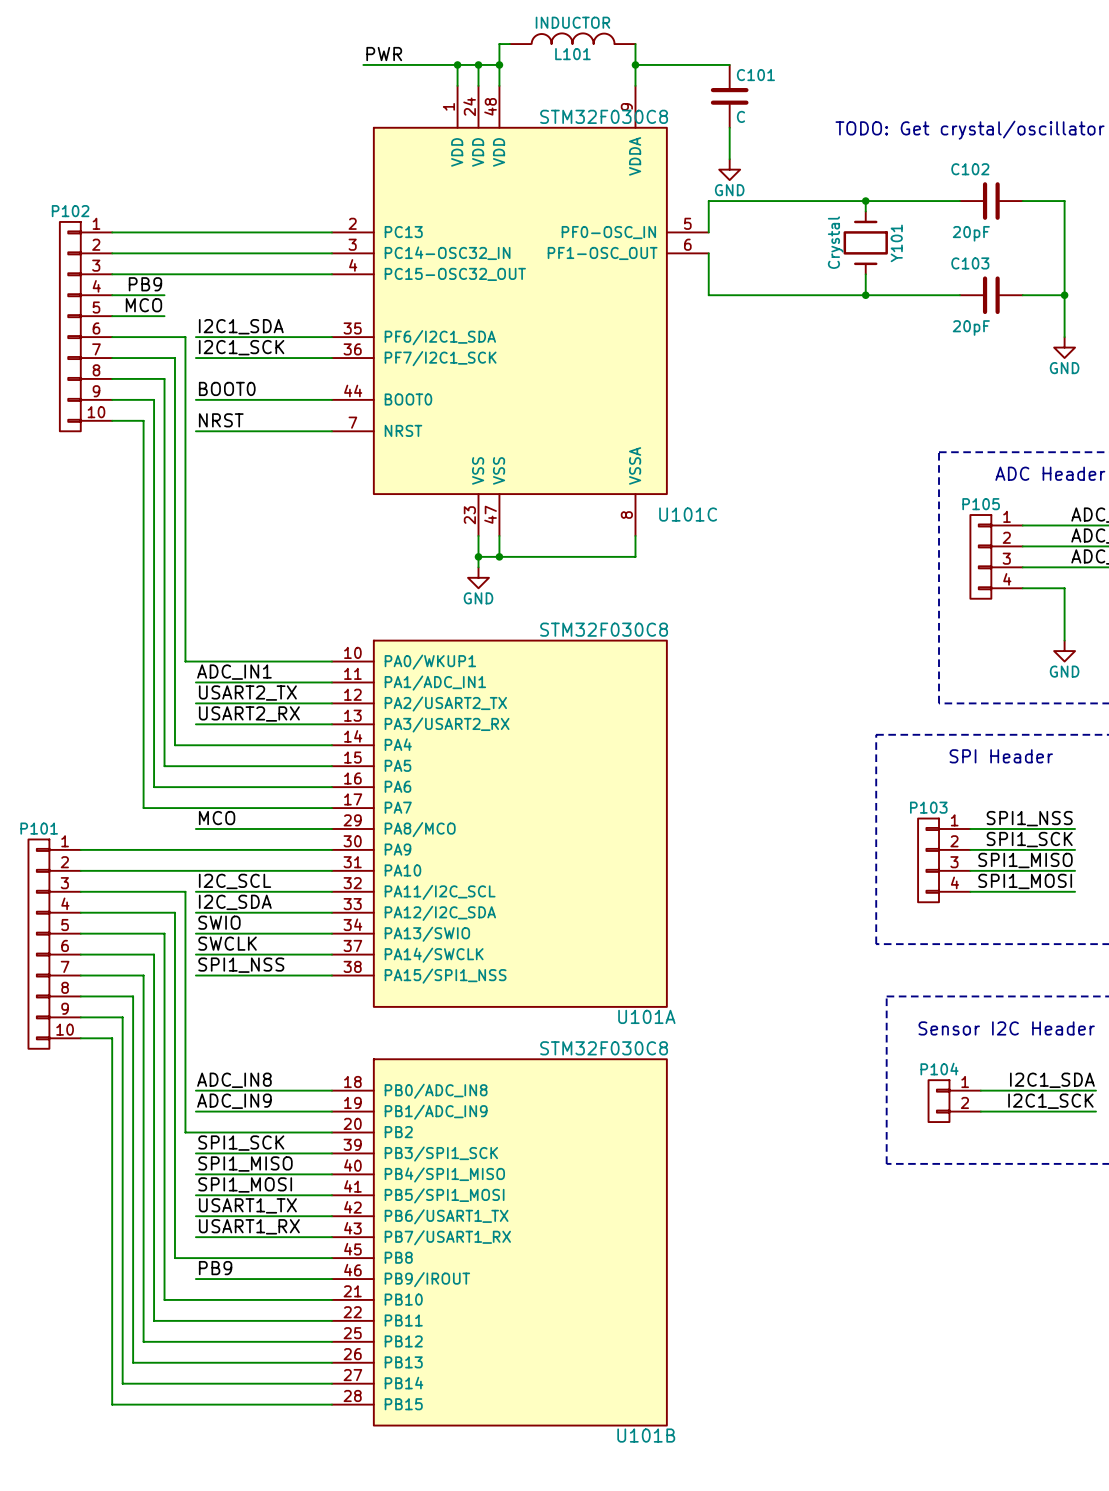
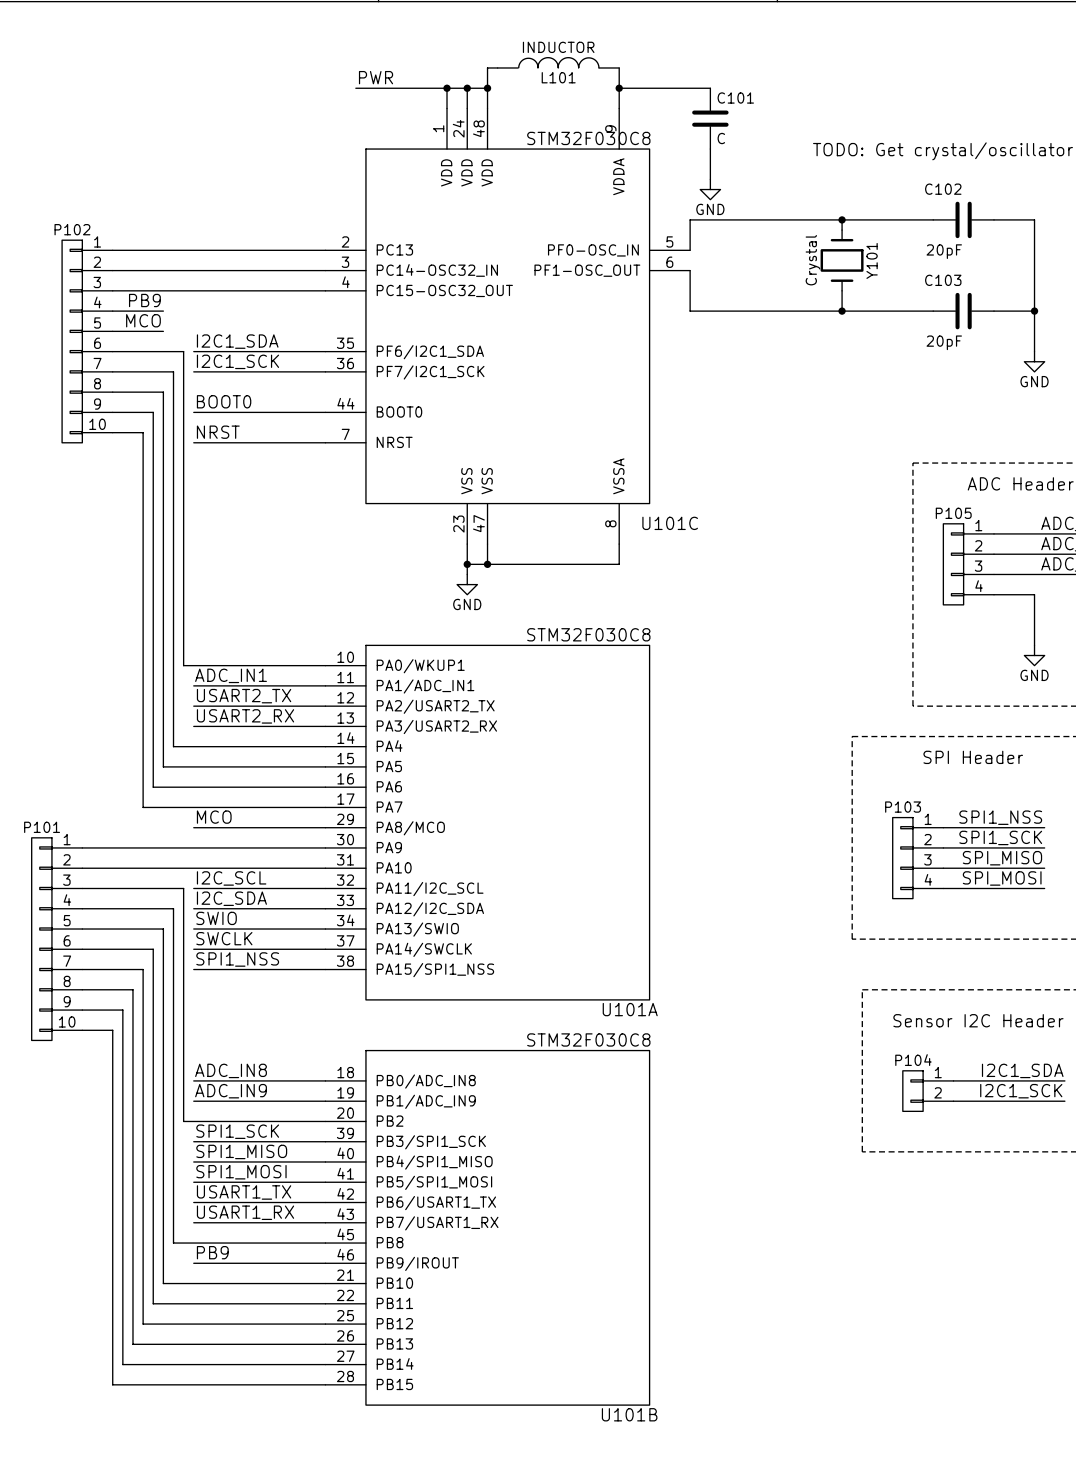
label: SPI1_MISO (1025, 860) -> SPI_MISO (1002, 858)
label: SPI1_MOSI (1025, 881) -> SPI_MOSI (1002, 878)

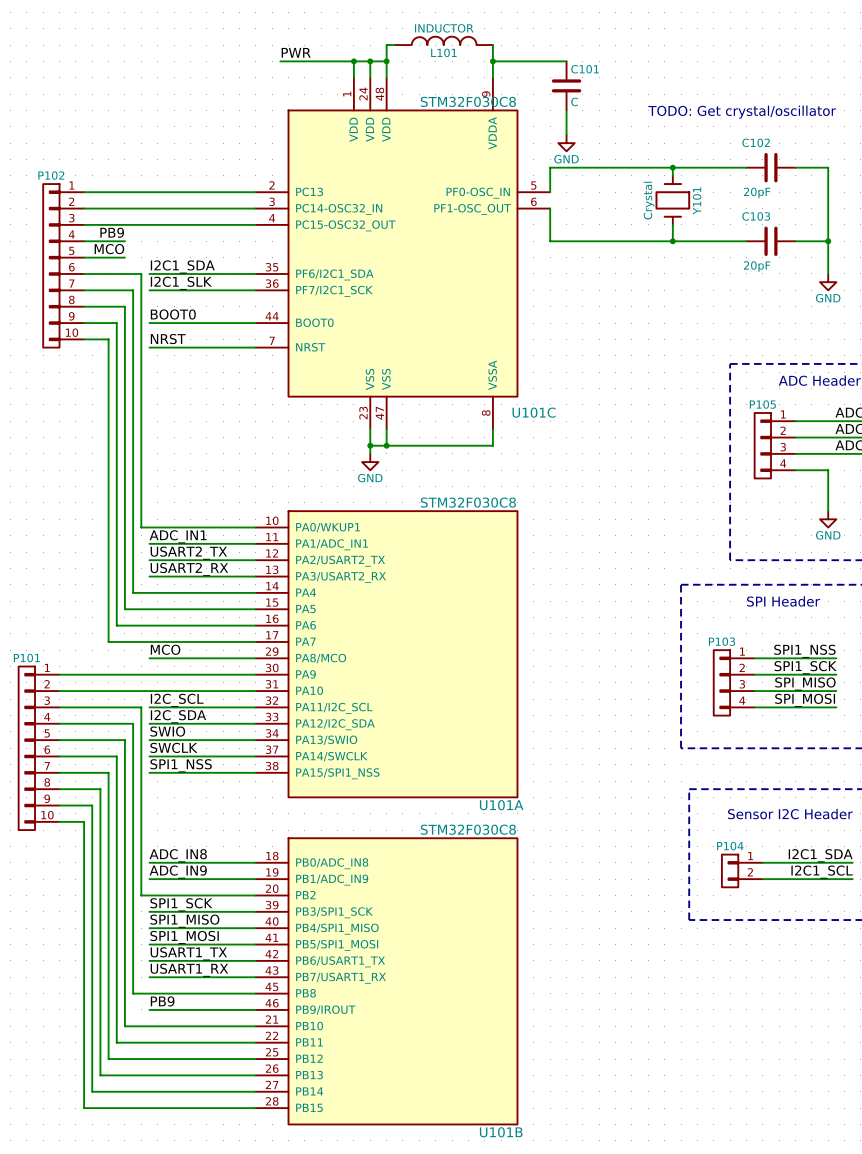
label: I2C1_SCK (237, 361) -> I2C1_SLK (181, 283)
label: I2C1_SCK (1021, 1091) -> I2C1_SCL (822, 872)

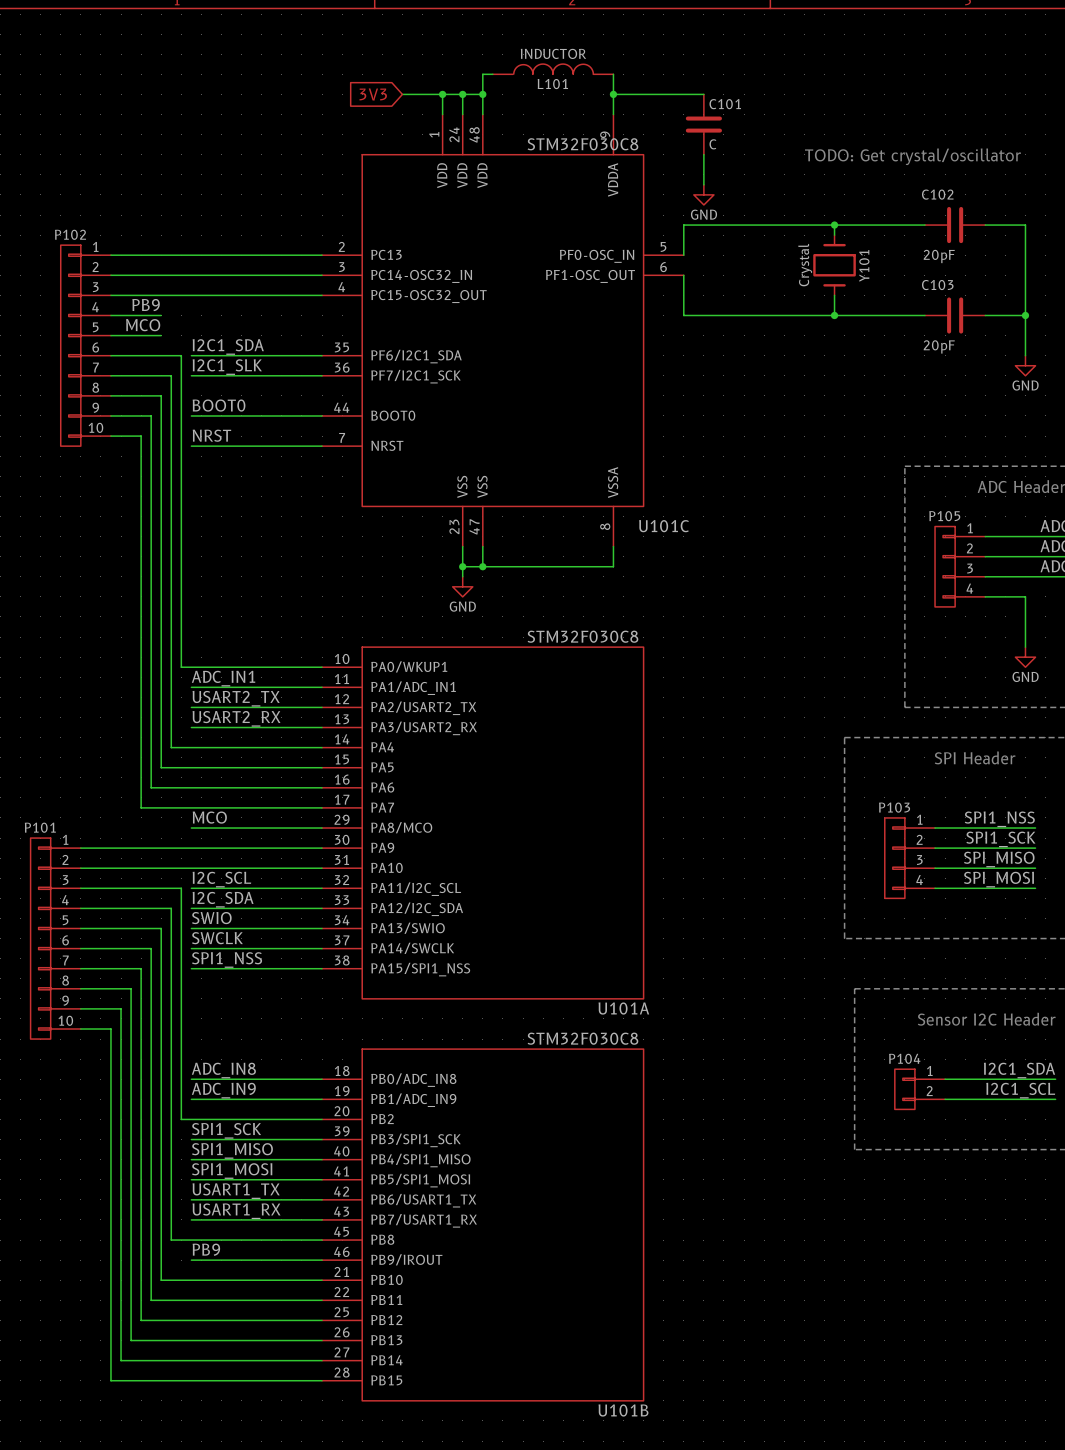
label: PWR (296, 52) -> none
wire: (280, 61) (321, 61) -> none
global label: none -> 3V3 (373, 94)

